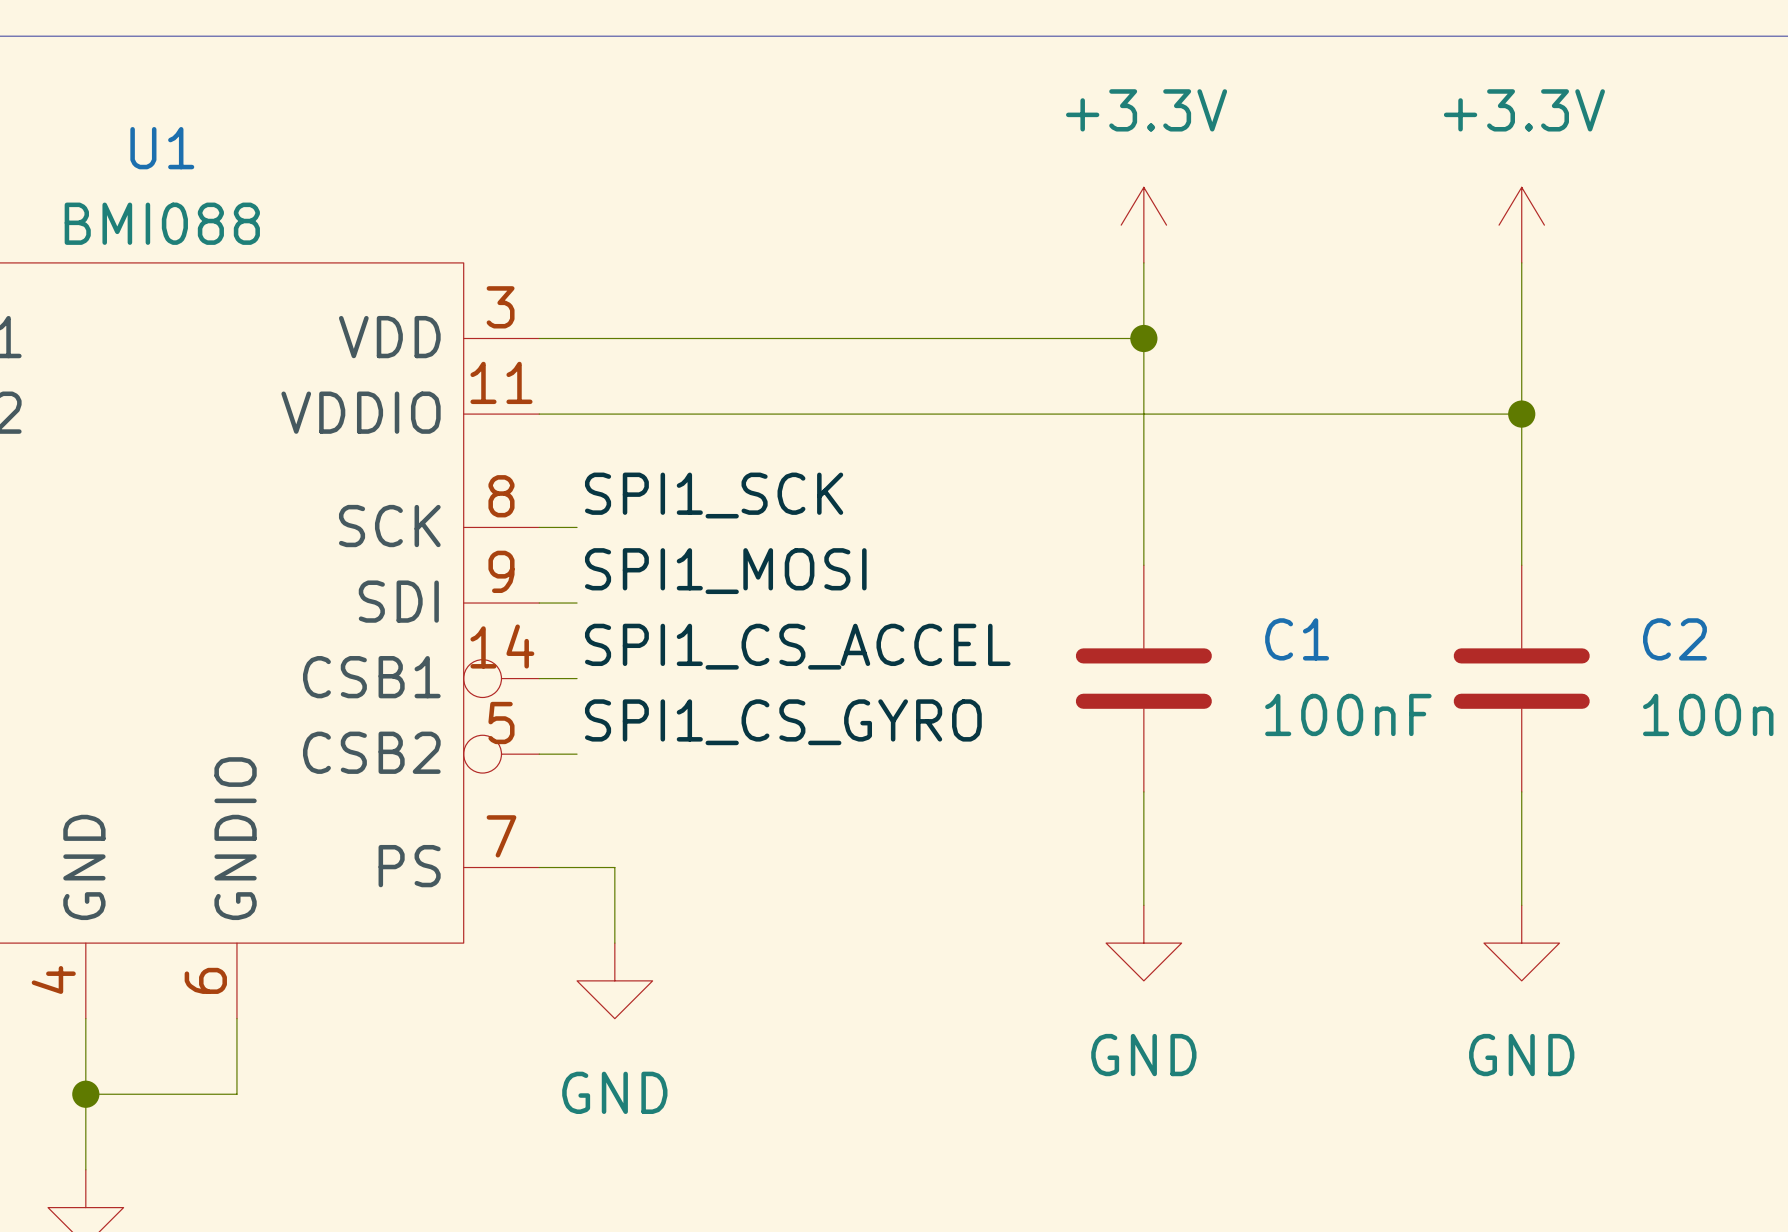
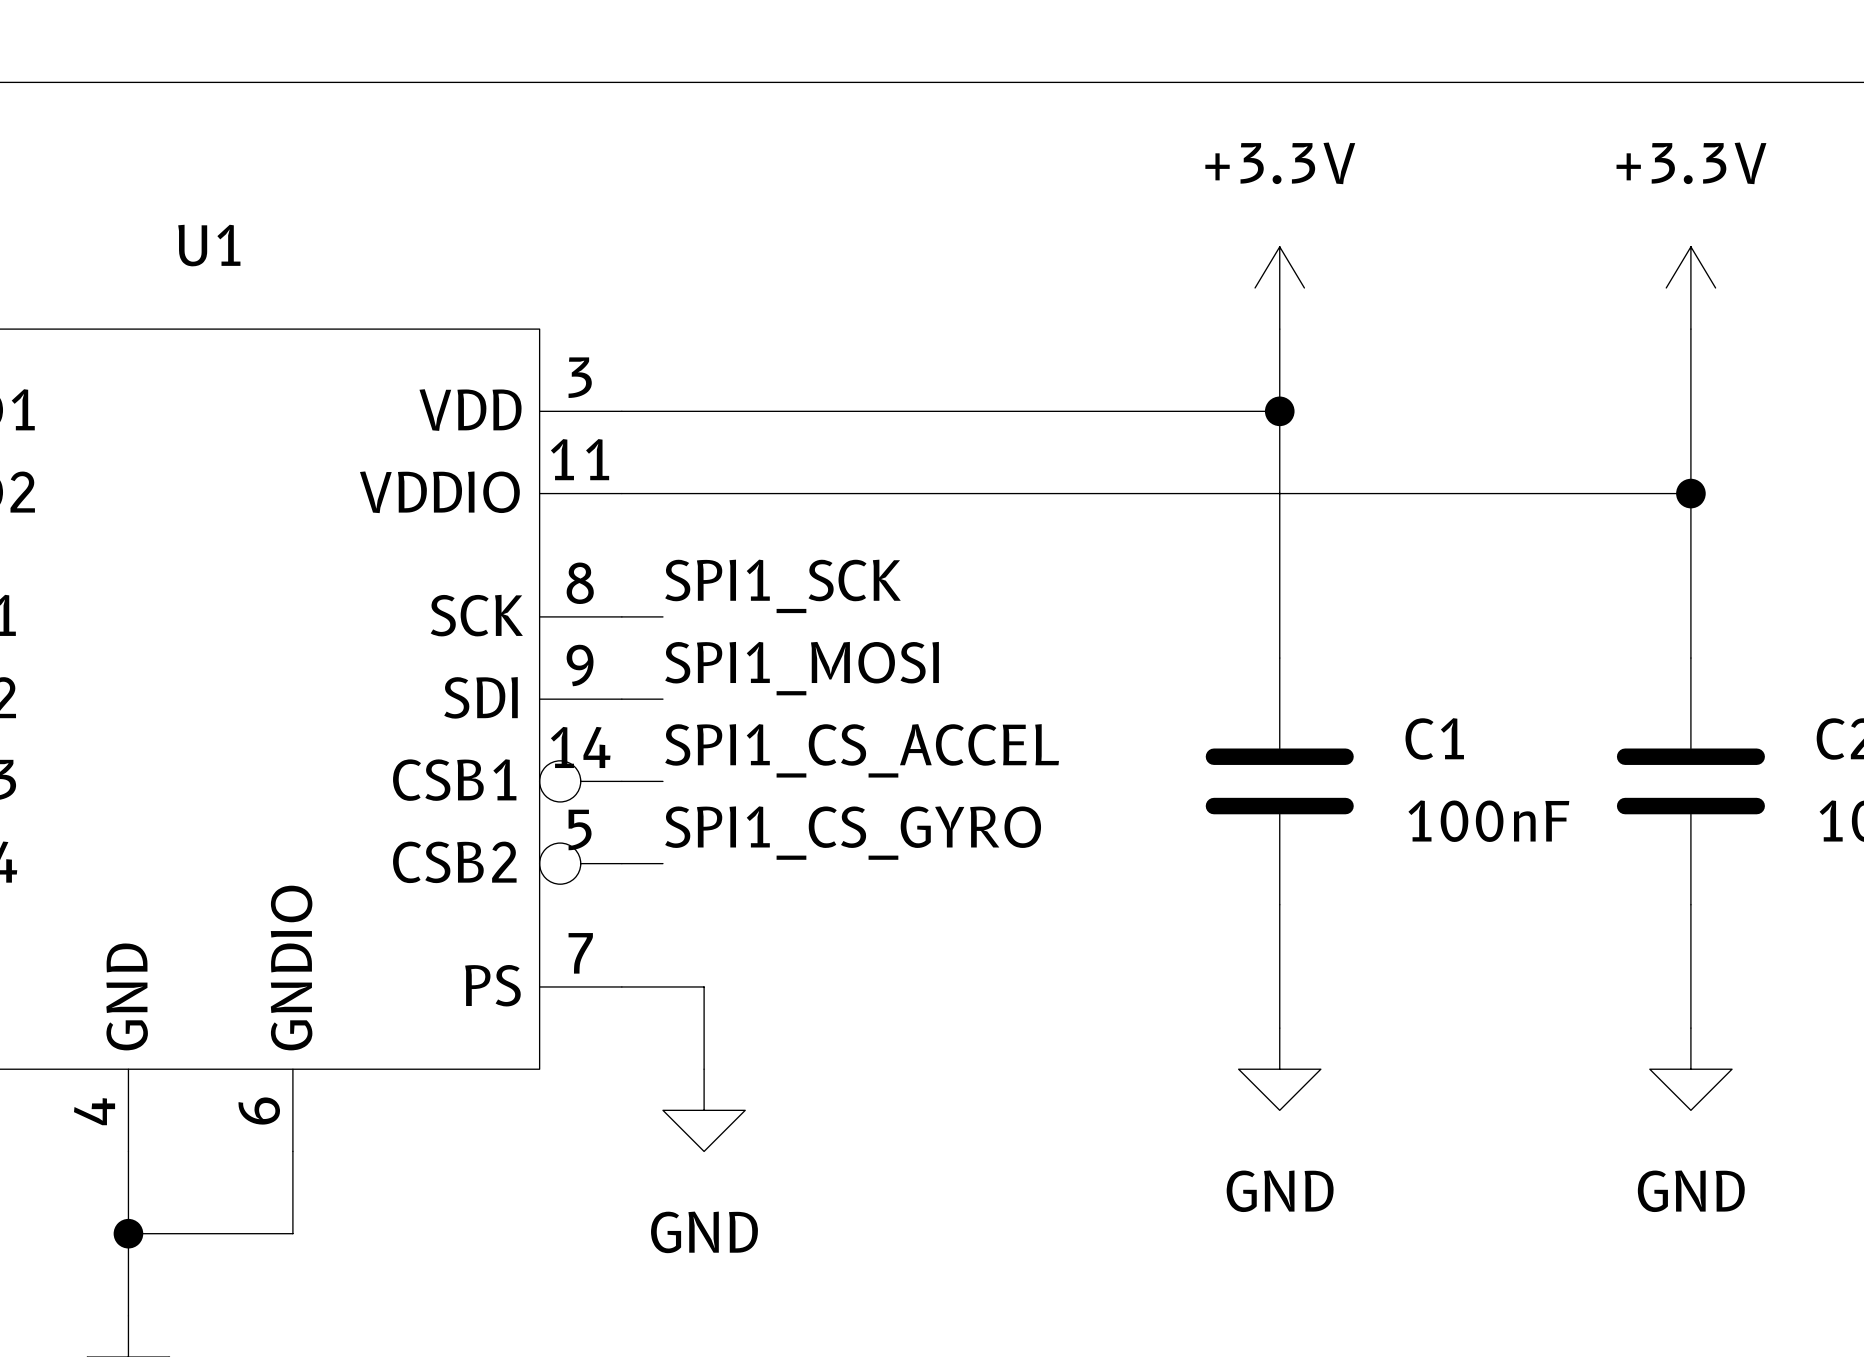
U1 name position: U1 (162, 148) -> U1 (209, 245)
U1 value: BMI088 (162, 223) -> none

